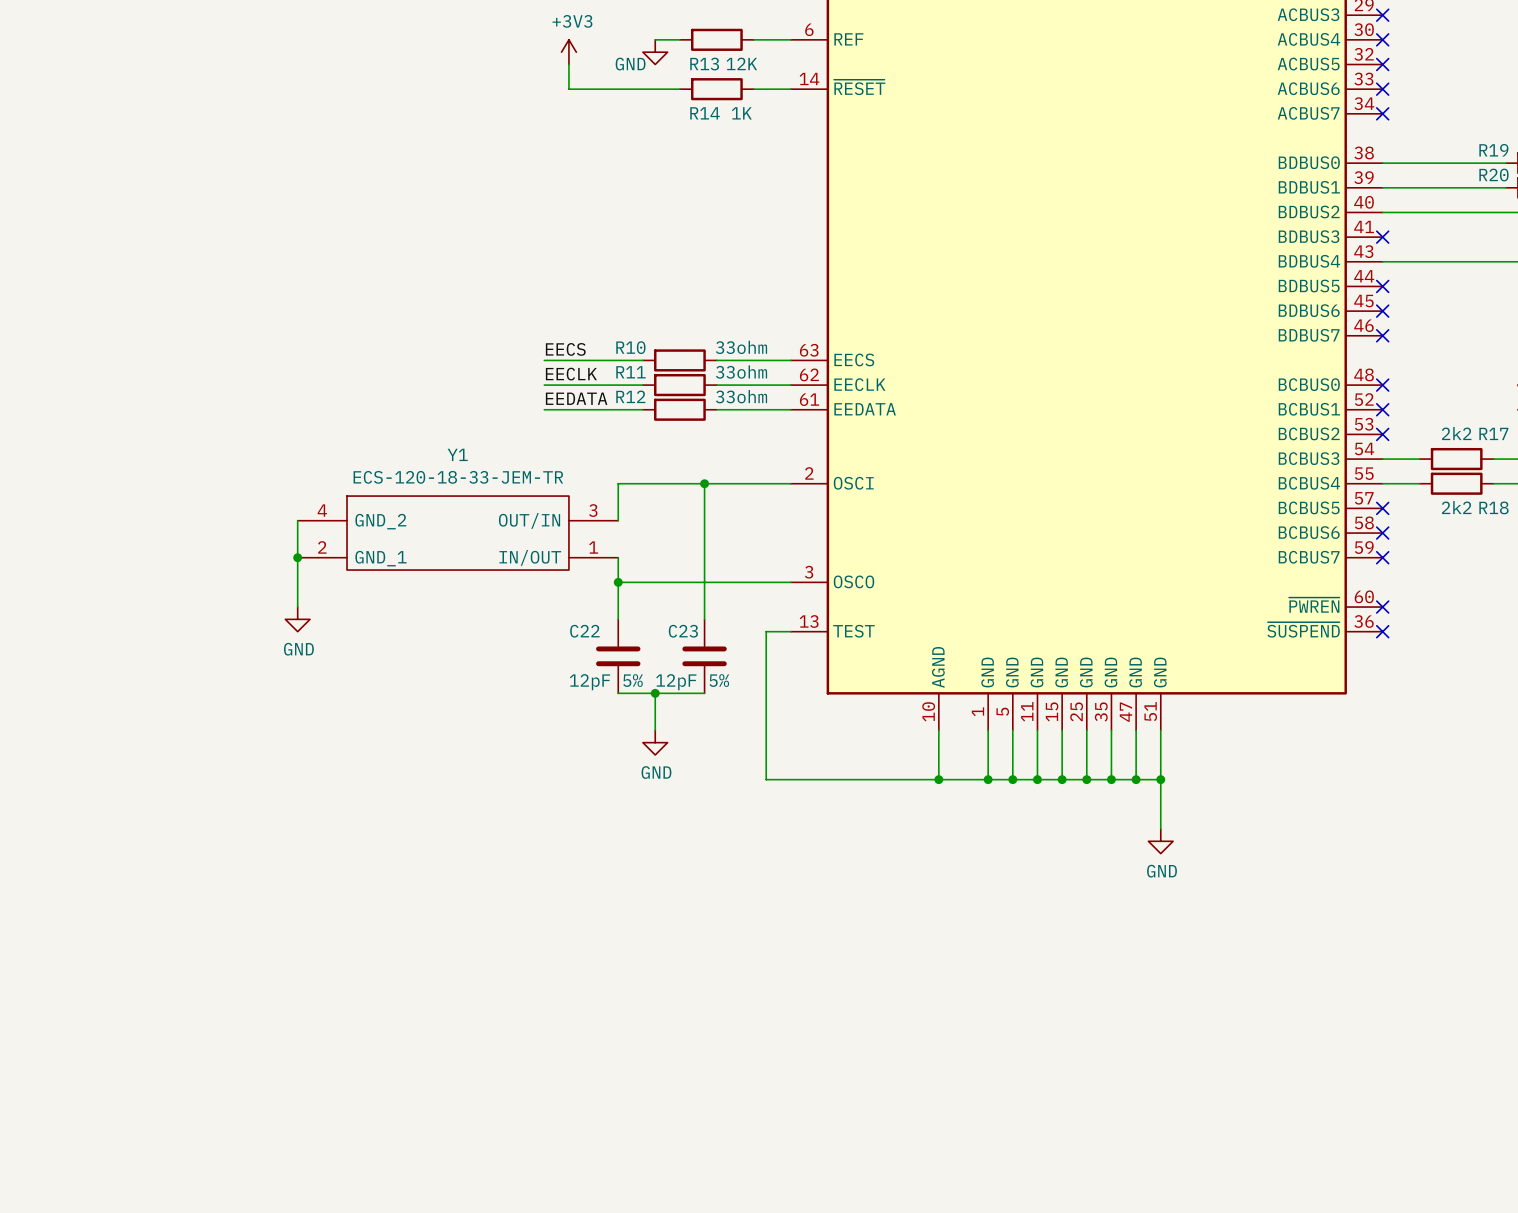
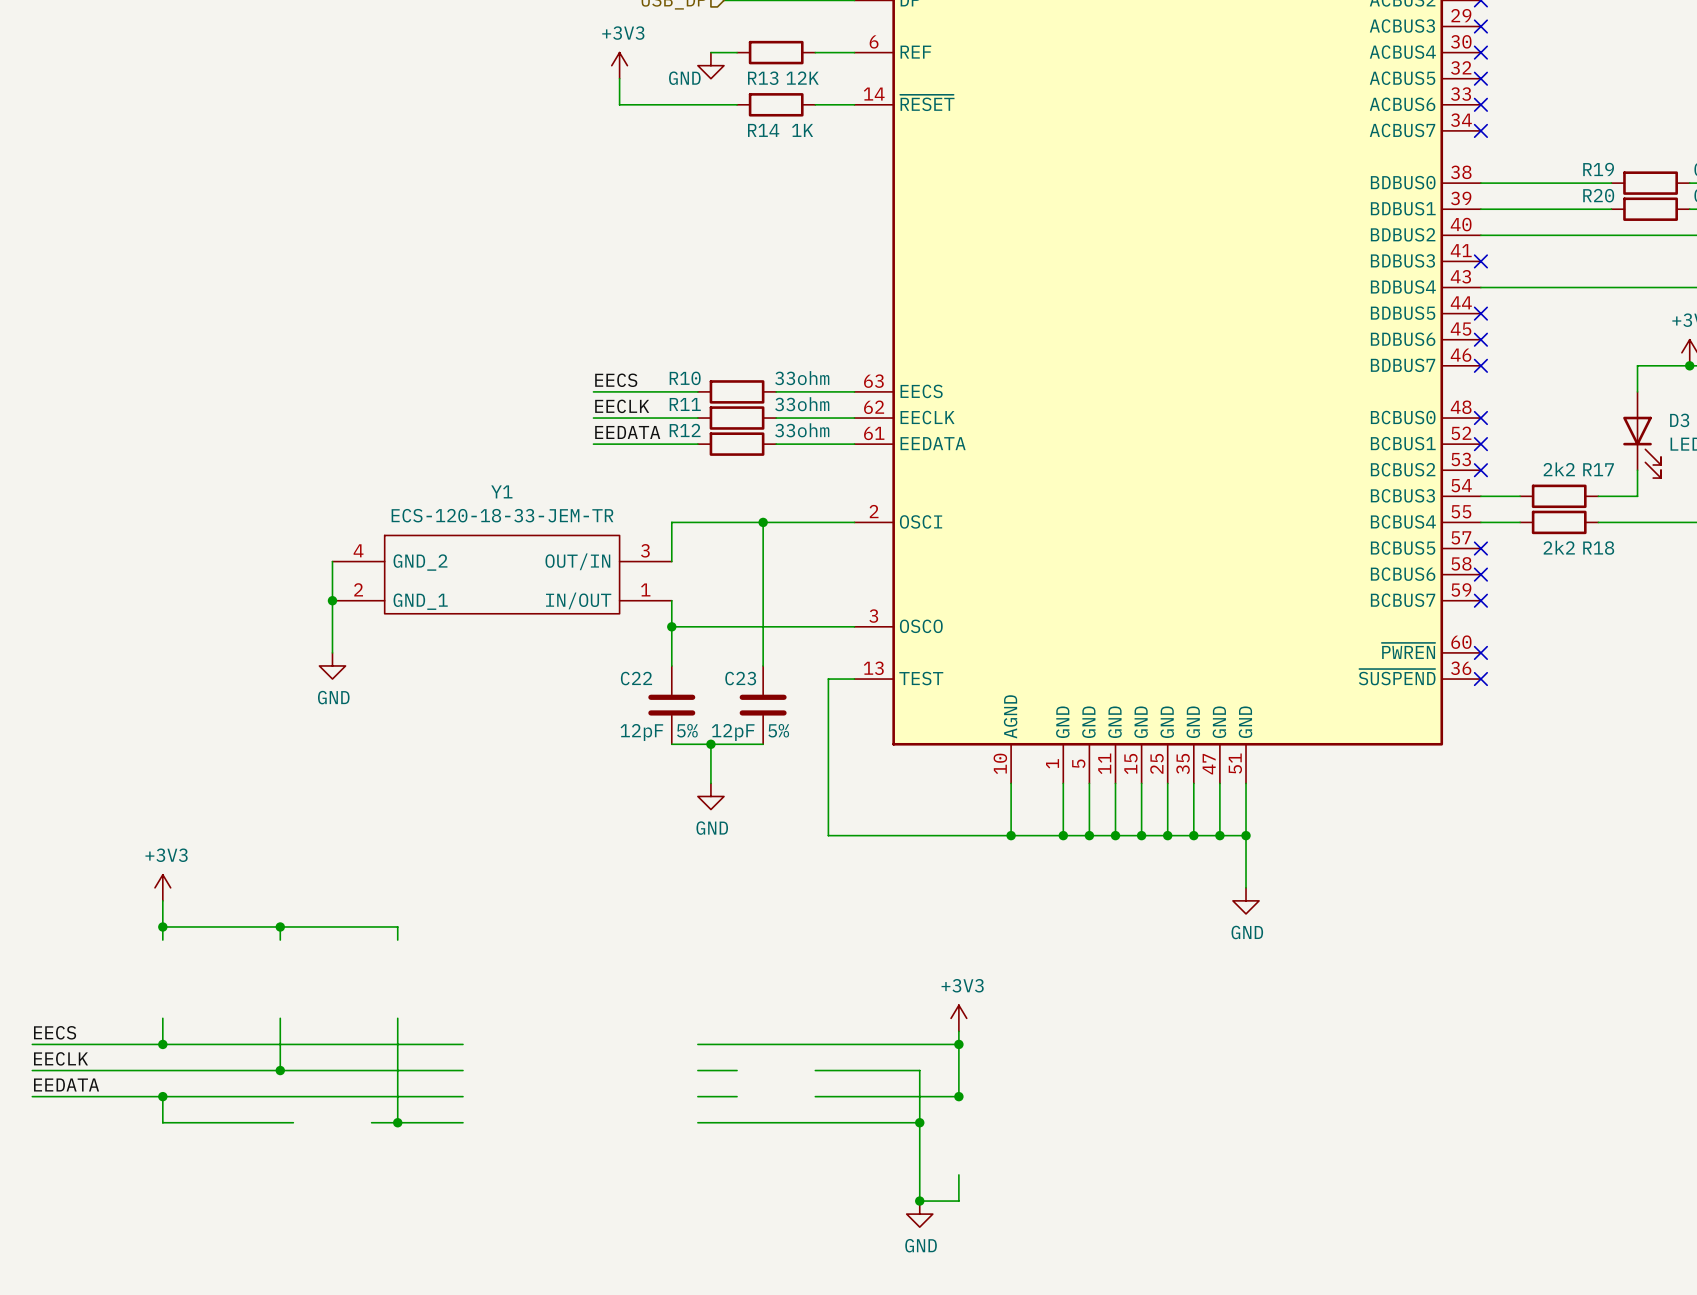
power symbol: none -> +3V3 (162, 887)
wire: none -> (162, 900) (162, 940)
wire: none -> (162, 926) (397, 926) (397, 940)
junction: none -> (162, 926)
wire: none -> (280, 926) (280, 940)
junction: none -> (280, 926)
wire: none -> (162, 1018) (162, 1044)
wire: none -> (280, 1018) (280, 1070)
wire: none -> (397, 1018) (397, 1122)
power symbol: none -> +3V3 (958, 1018)
wire: none -> (958, 1031) (958, 1096) (815, 1096)
label: none -> EECS (55, 1032)
wire: none -> (32, 1044) (462, 1044)
junction: none -> (162, 1044)
wire: none -> (697, 1044) (958, 1044)
junction: none -> (958, 1044)
label: none -> EECLK (61, 1058)
wire: none -> (32, 1070) (462, 1070)
junction: none -> (280, 1070)
wire: none -> (697, 1070) (737, 1070)
wire: none -> (815, 1070) (919, 1070) (919, 1201) (958, 1201) (958, 1174)
label: none -> EEDATA (66, 1084)
wire: none -> (32, 1096) (462, 1096)
wire: none -> (162, 1096) (162, 1122) (293, 1122)
junction: none -> (162, 1096)
wire: none -> (697, 1096) (737, 1096)
junction: none -> (958, 1096)
wire: none -> (371, 1122) (462, 1122)
junction: none -> (397, 1122)
wire: none -> (697, 1122) (919, 1122)
junction: none -> (919, 1122)
junction: none -> (919, 1201)
power symbol: none -> GND (919, 1214)

